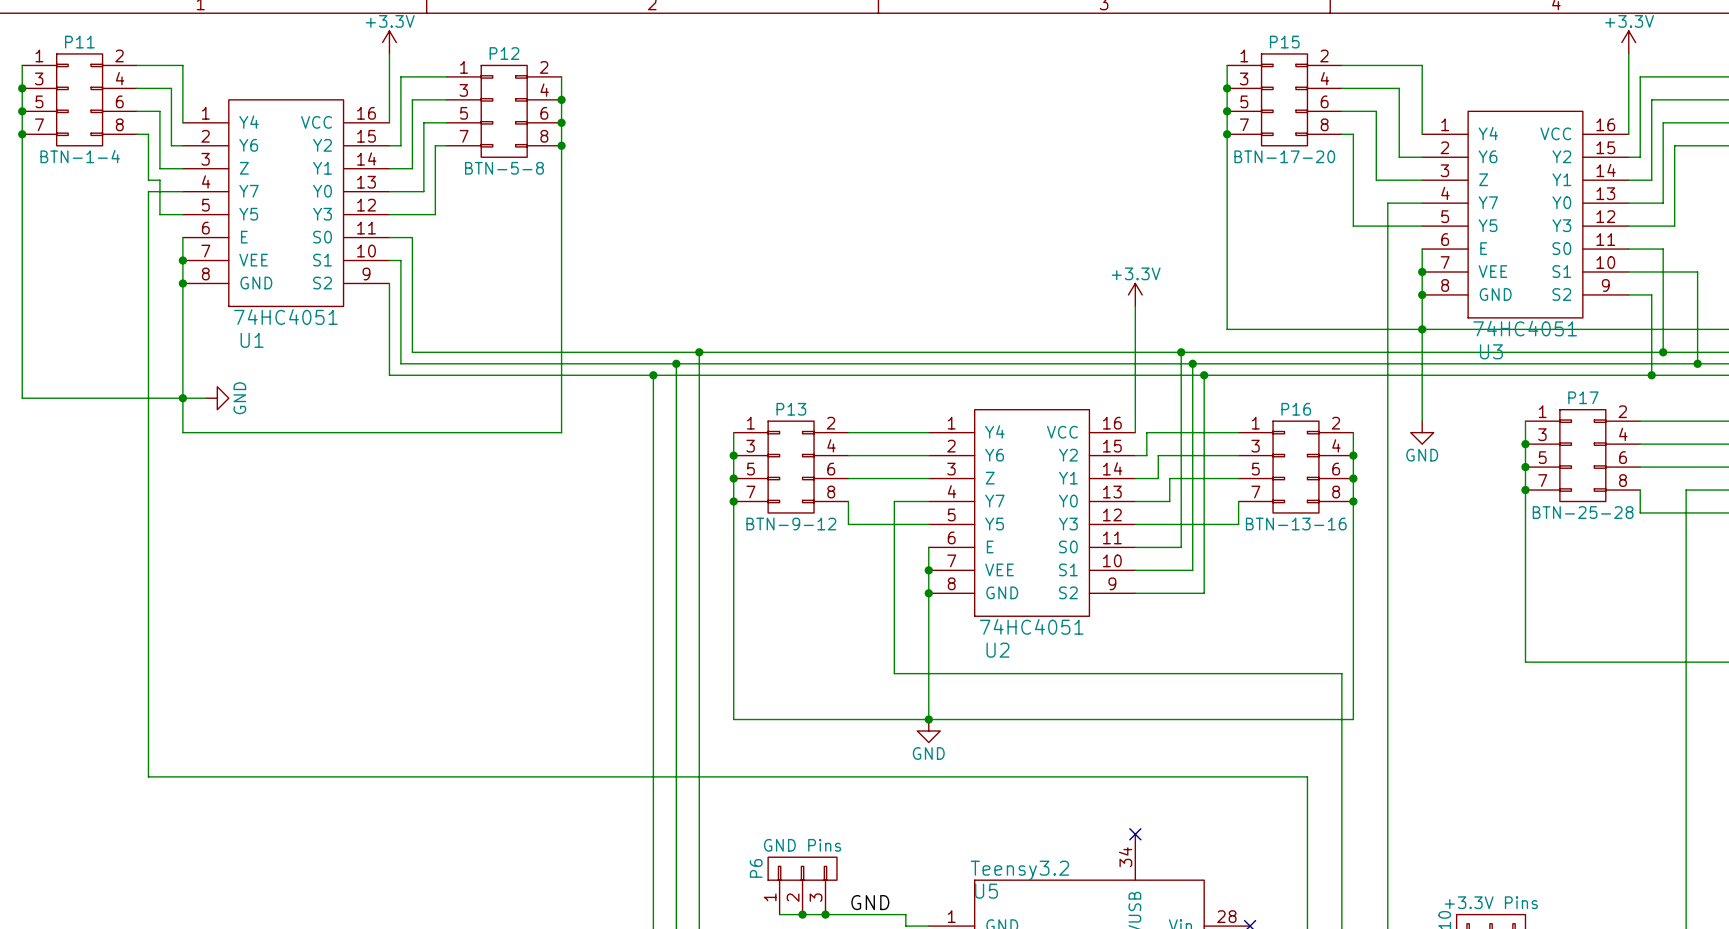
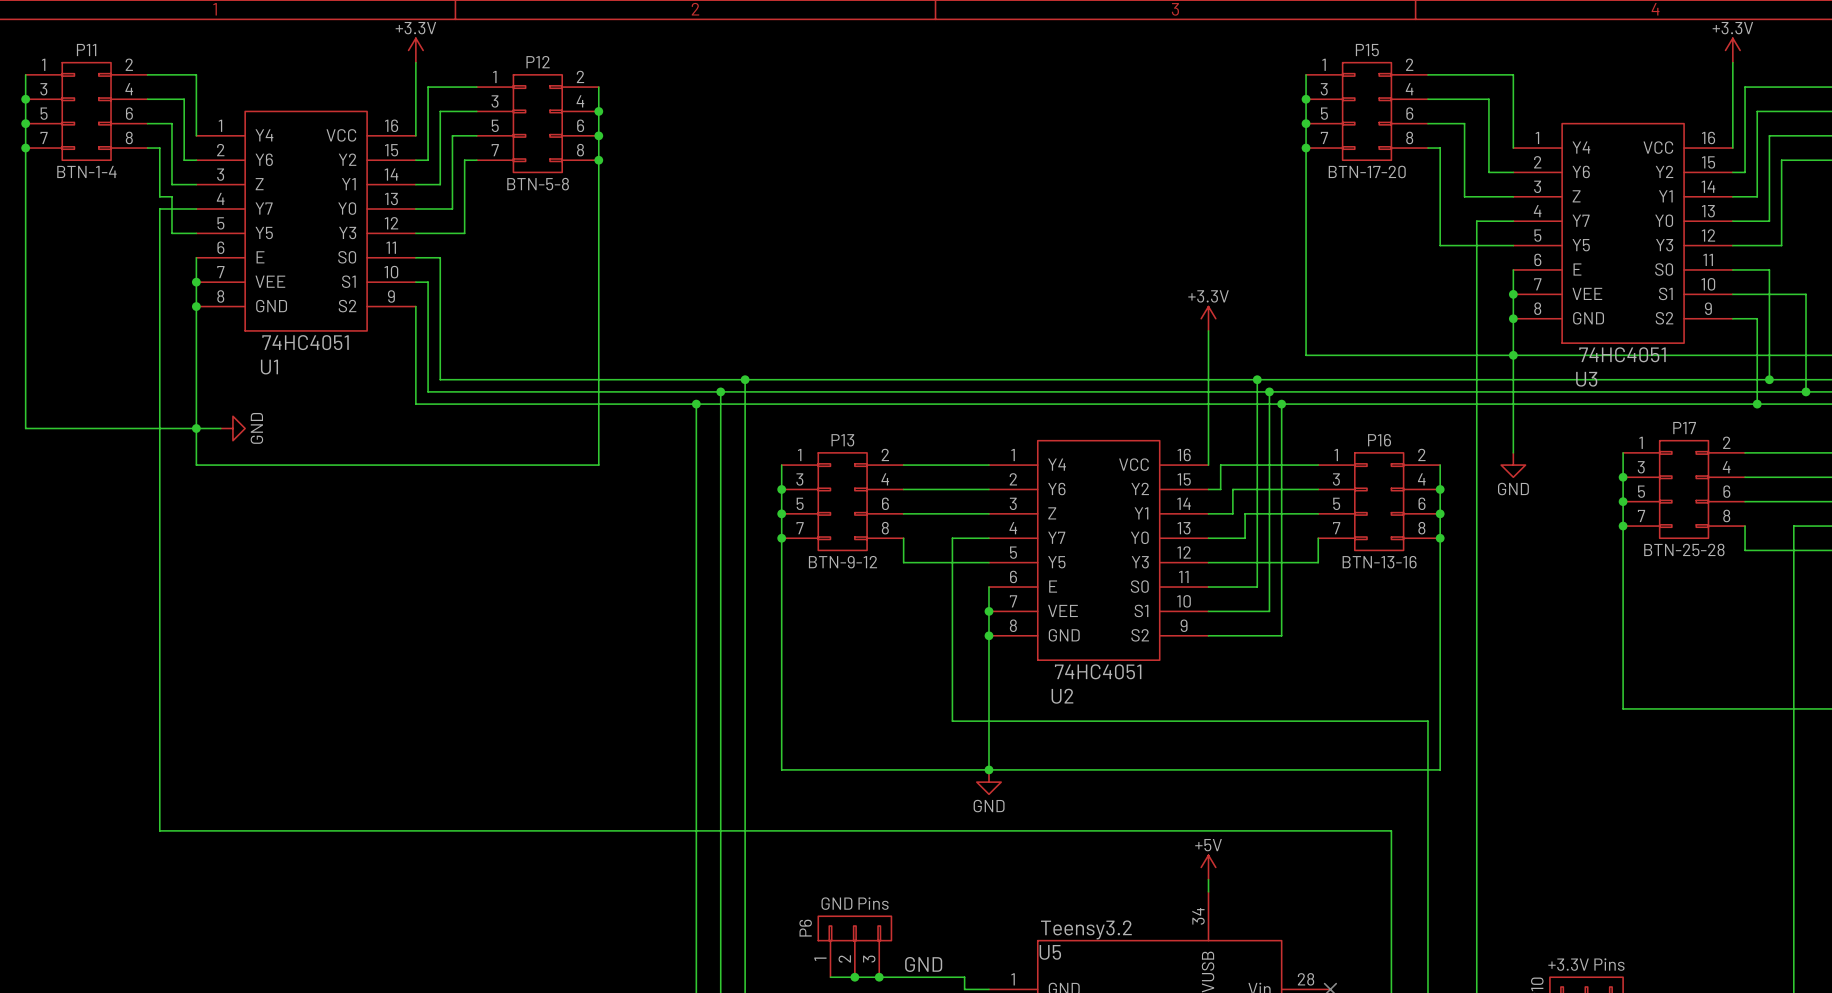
power symbol: none -> +5V (1208, 867)
wire: none -> (1208, 879) (1208, 891)
no-connect mark: (1135, 834) -> none

